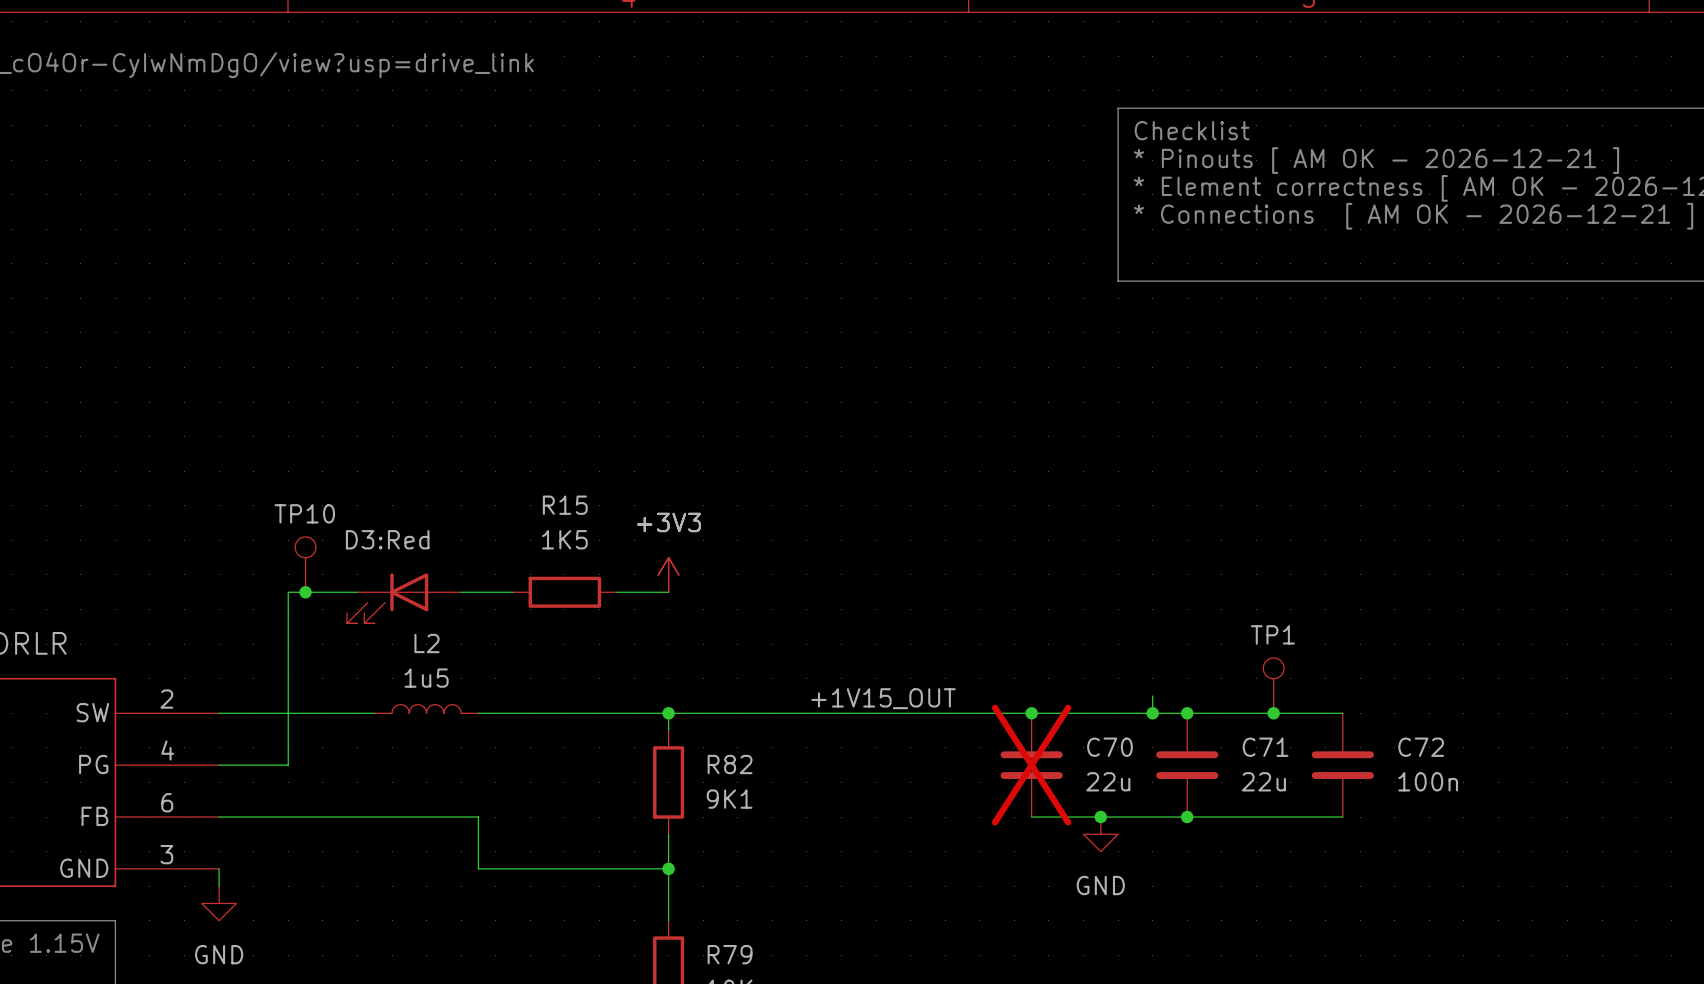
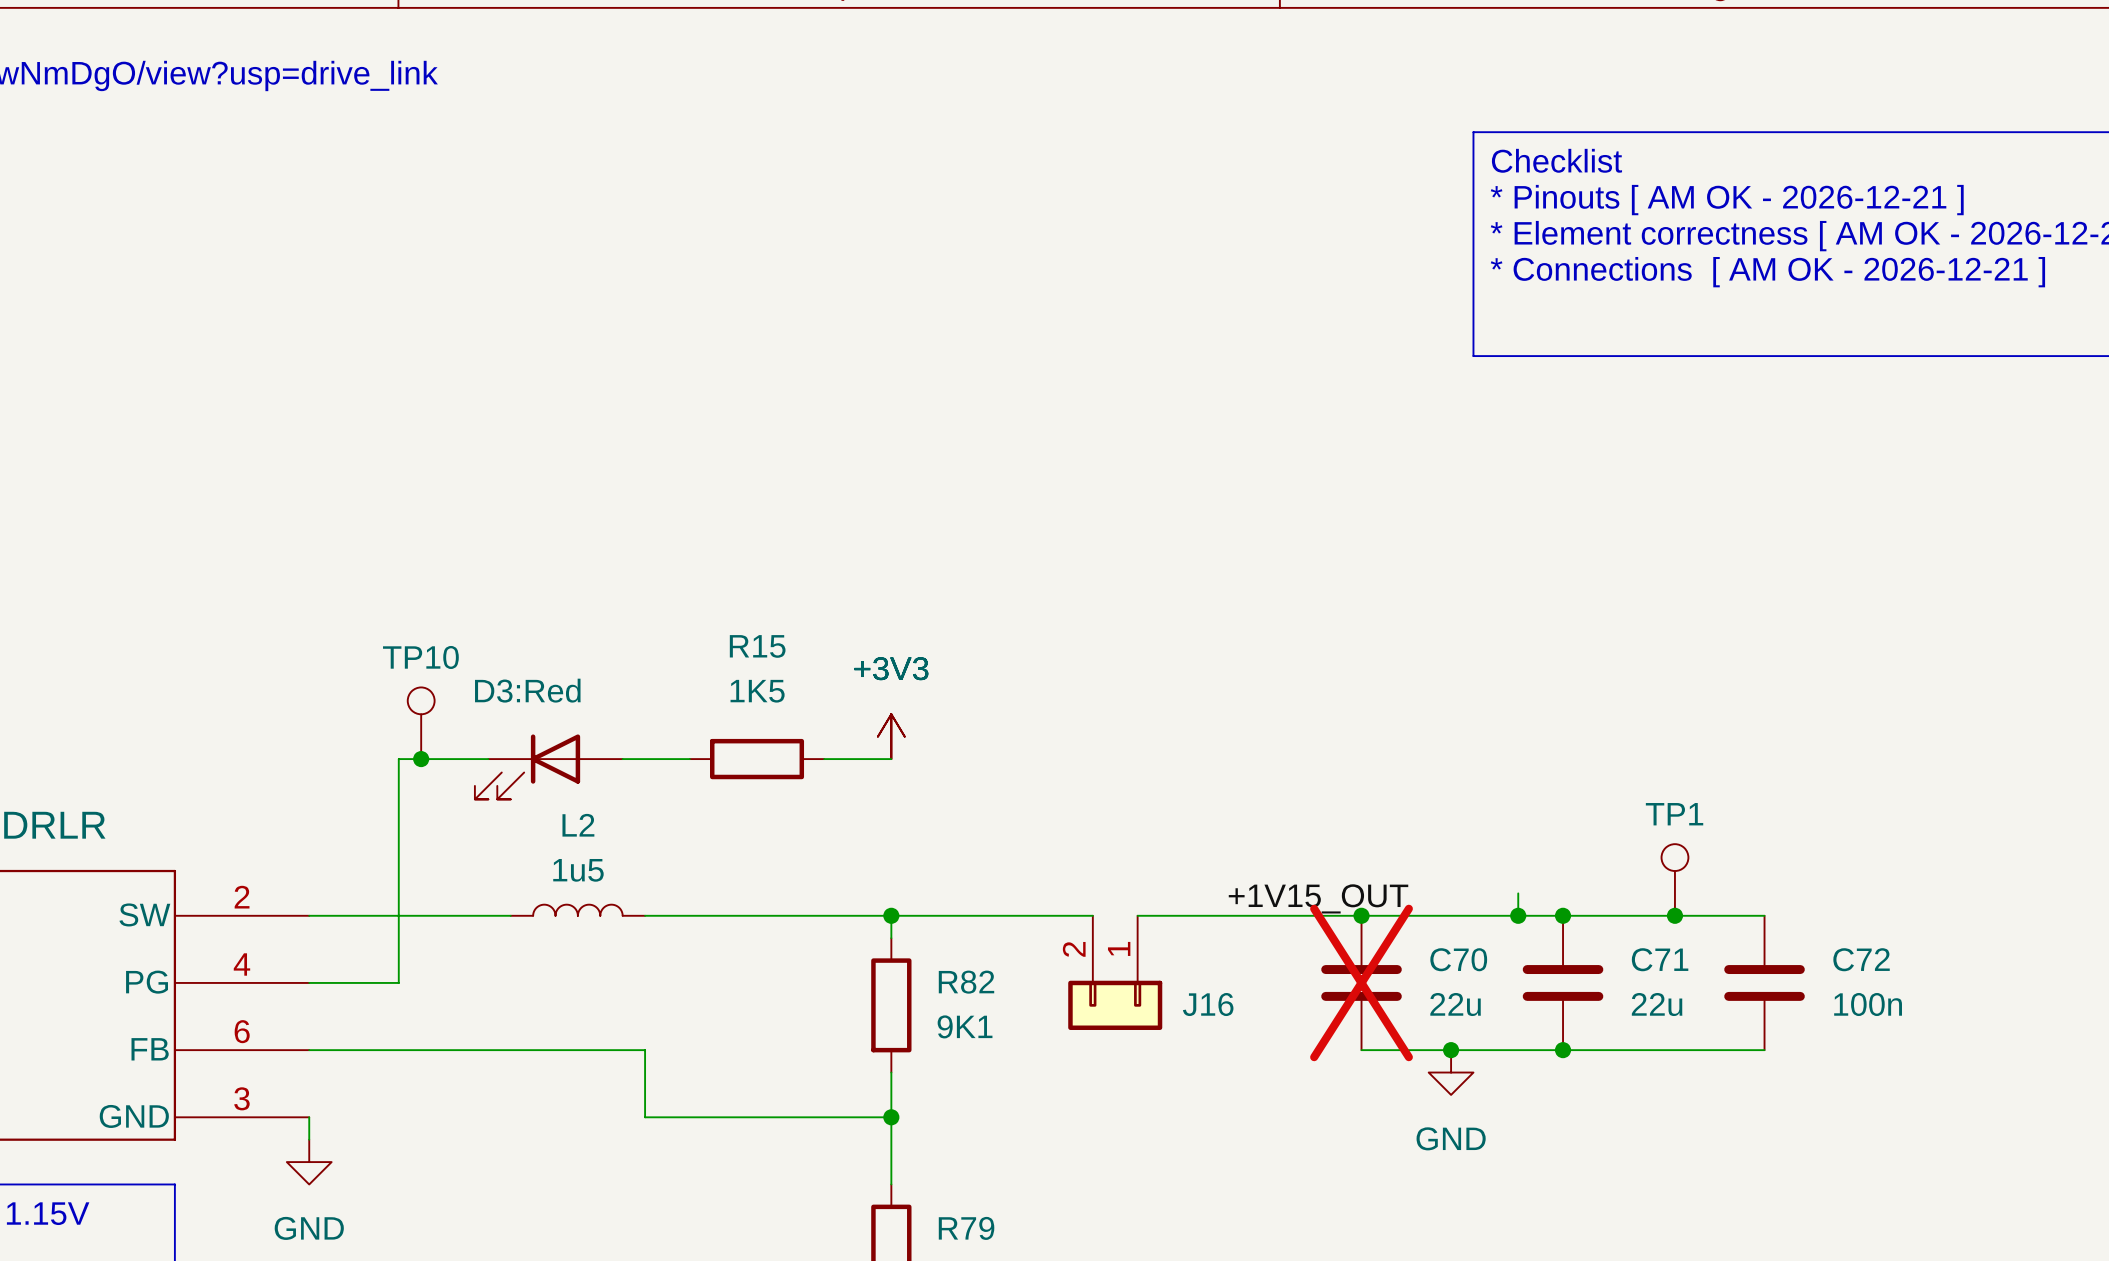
label position: +1V15_OUT (883, 698) -> +1V15_OUT (1318, 898)
wire: (824, 713) (858, 713) -> none
J16: none -> (1115, 972)

